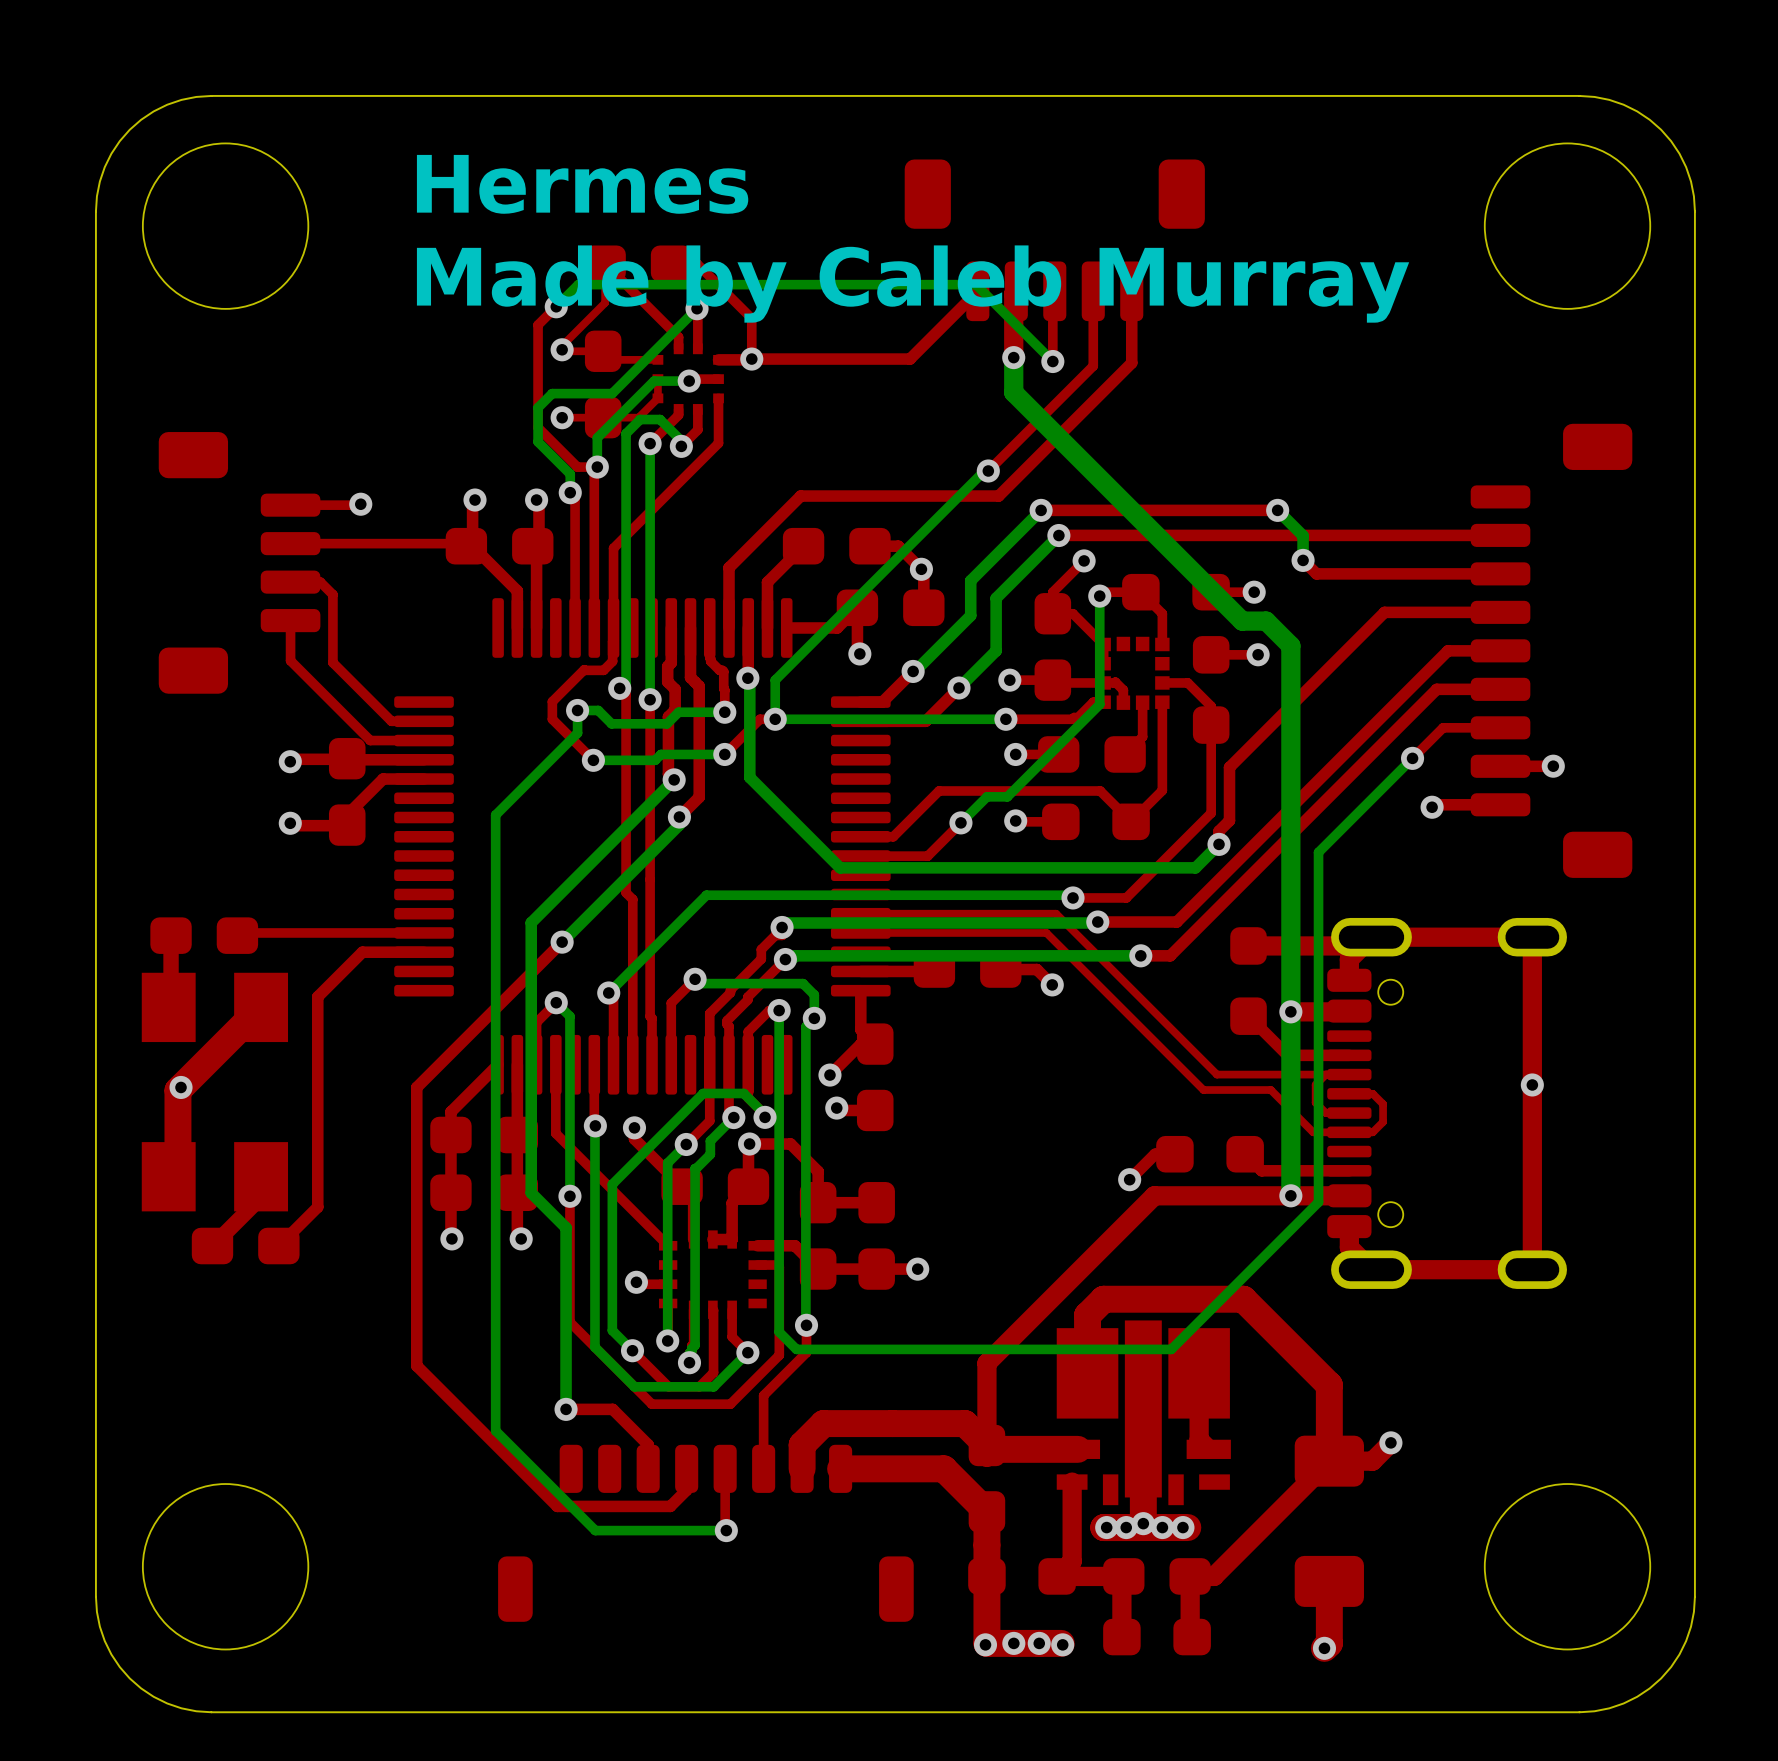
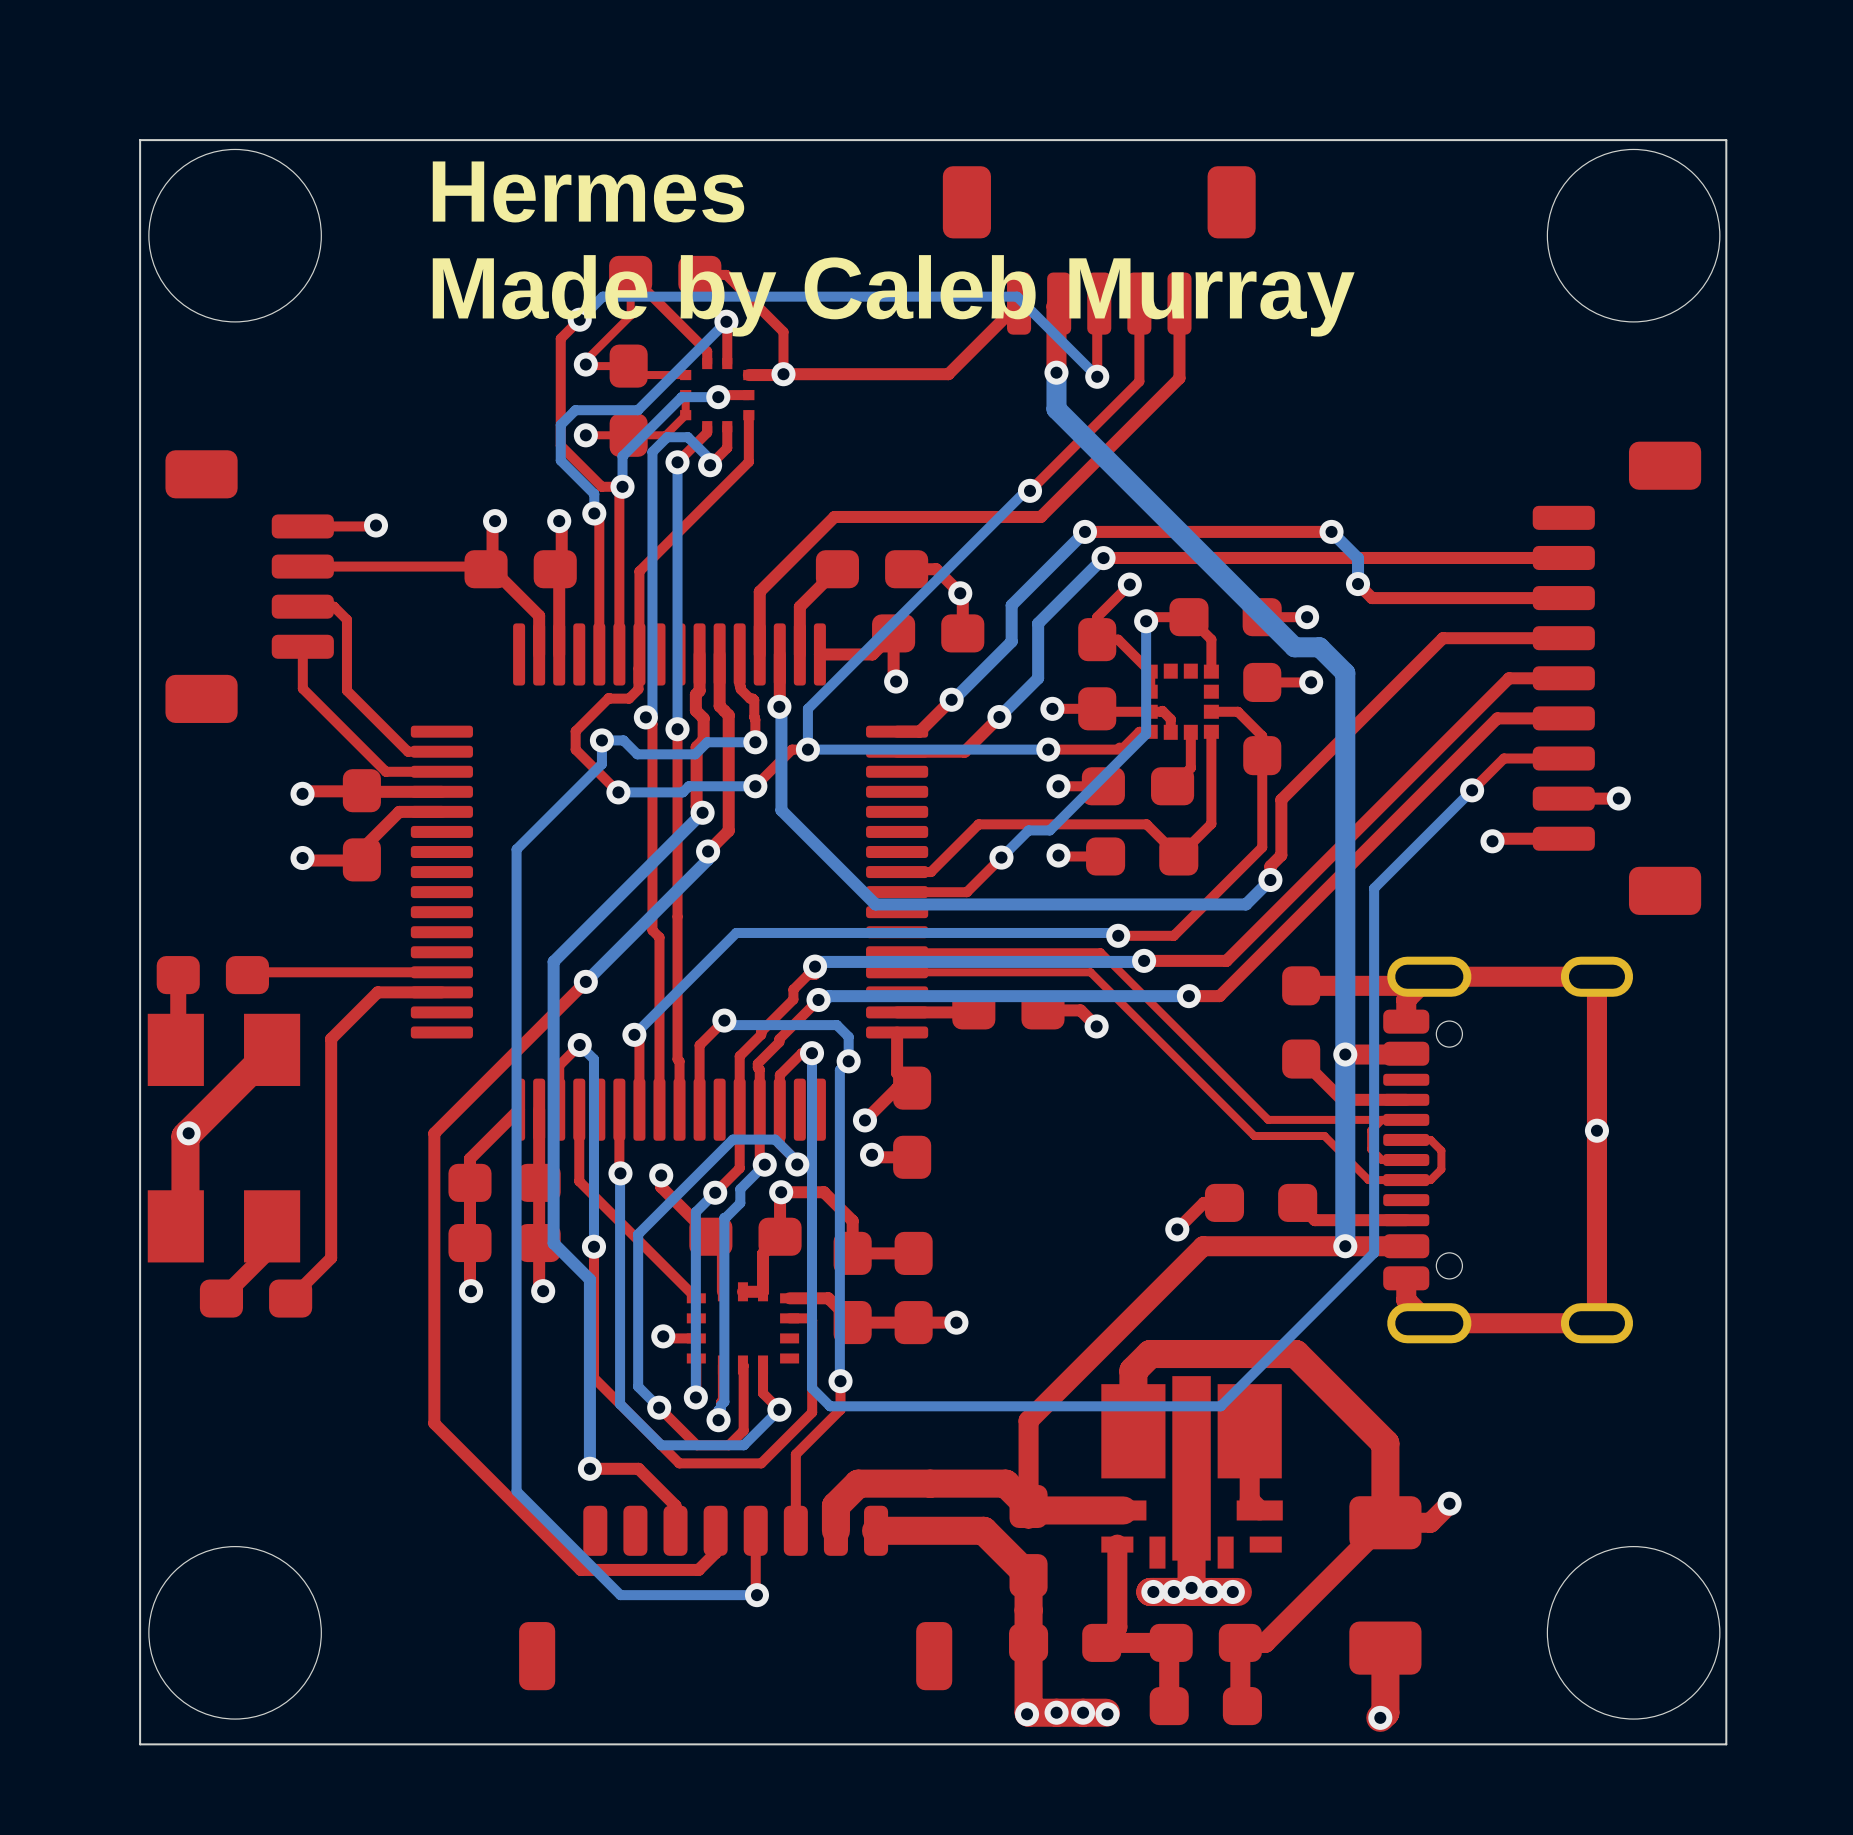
board edge: (1579, 95) (211, 95) (196, 96) (167, 104) (141, 119) (129, 129) (119, 141) (104, 167) (99, 181) (95, 211) (95, 1596) (96, 1611) (104, 1640) (111, 1654) (129, 1678) (141, 1688) (167, 1703) (181, 1708) (211, 1712) (1579, 1712) (1594, 1711) (1623, 1703) (1649, 1688) (1661, 1678) (1679, 1654) (1686, 1640) (1691, 1626) (1694, 1596) (1694, 211) (1691, 181) (1686, 167) (1679, 153) (1661, 129) (1637, 111) (1623, 104) (1609, 99) (1579, 95) -> (1726, 140) (1726, 1744) (140, 1744) (140, 140) (1726, 140)

